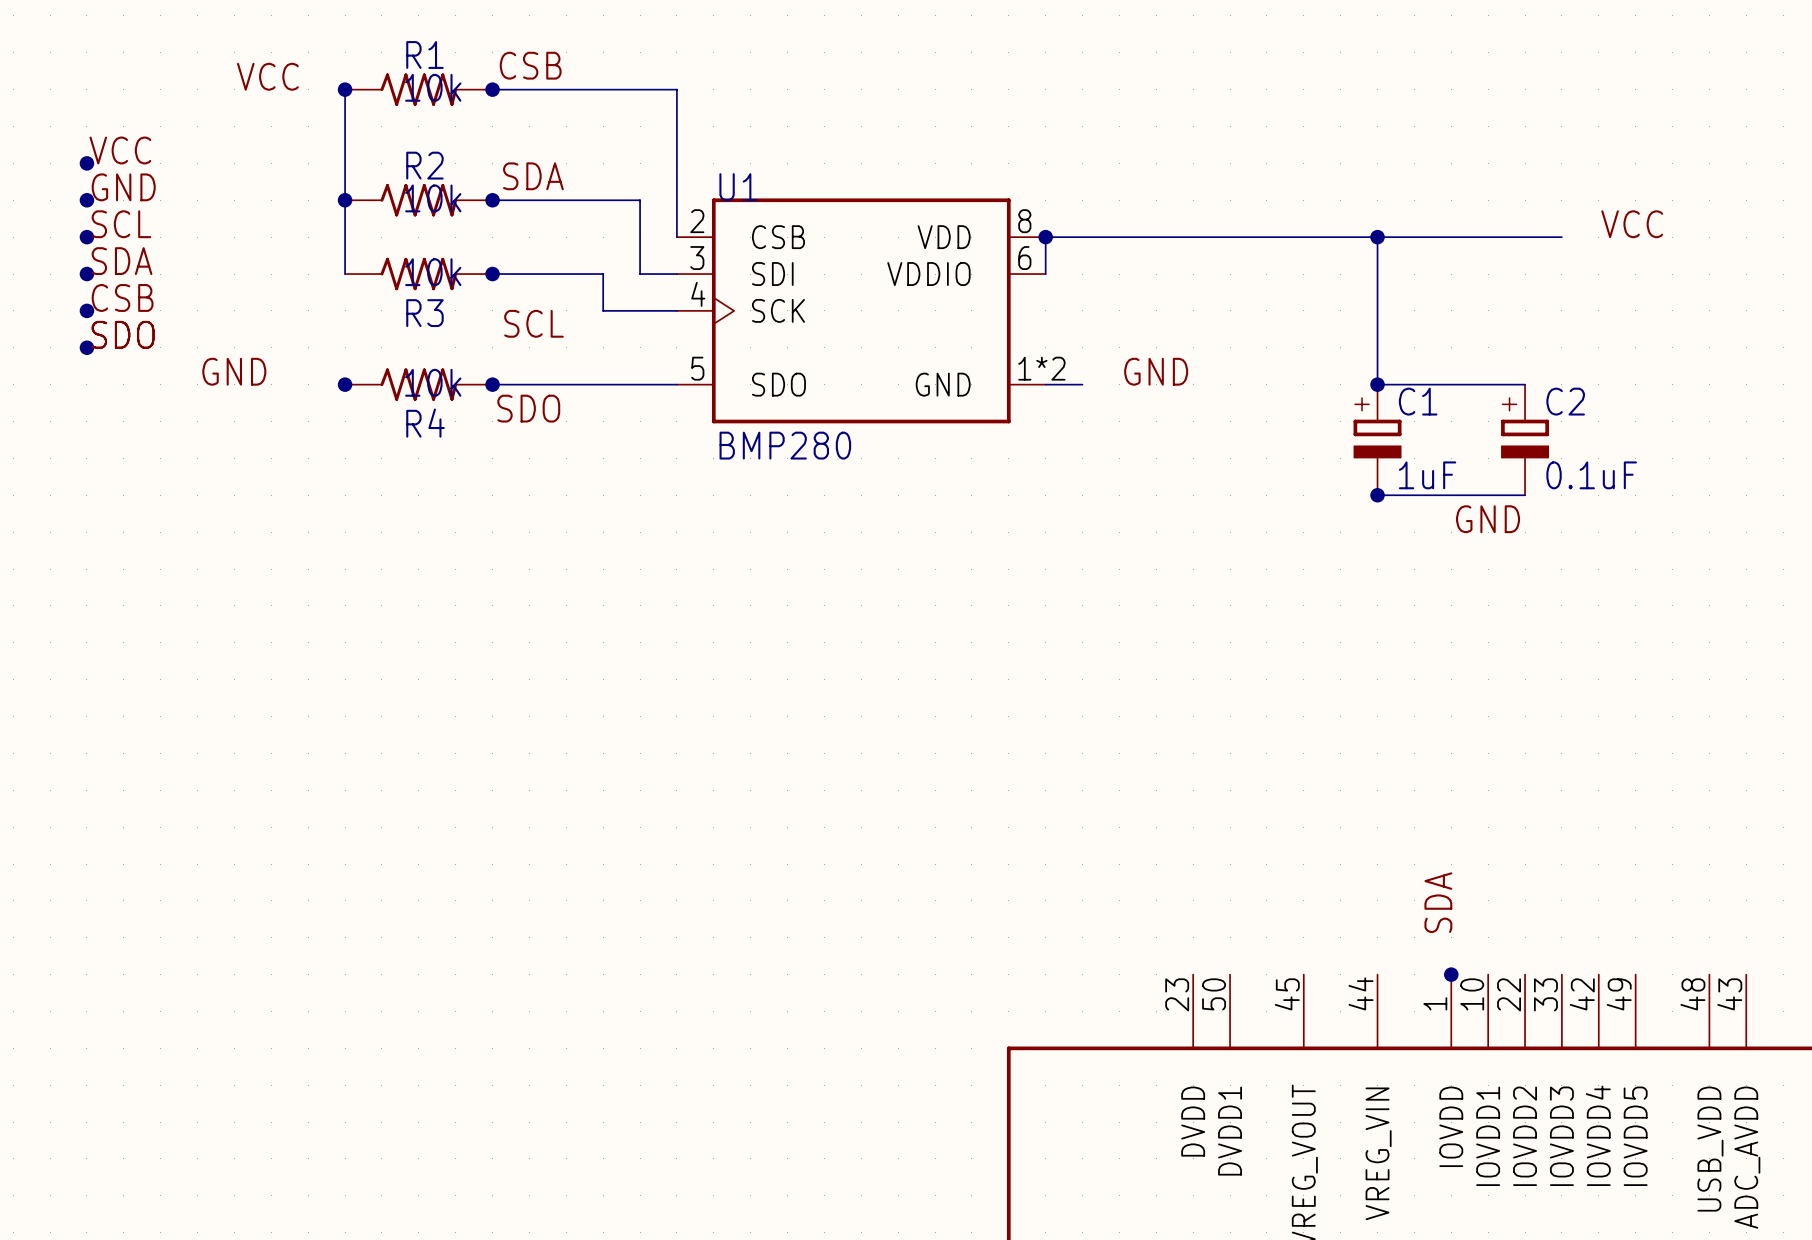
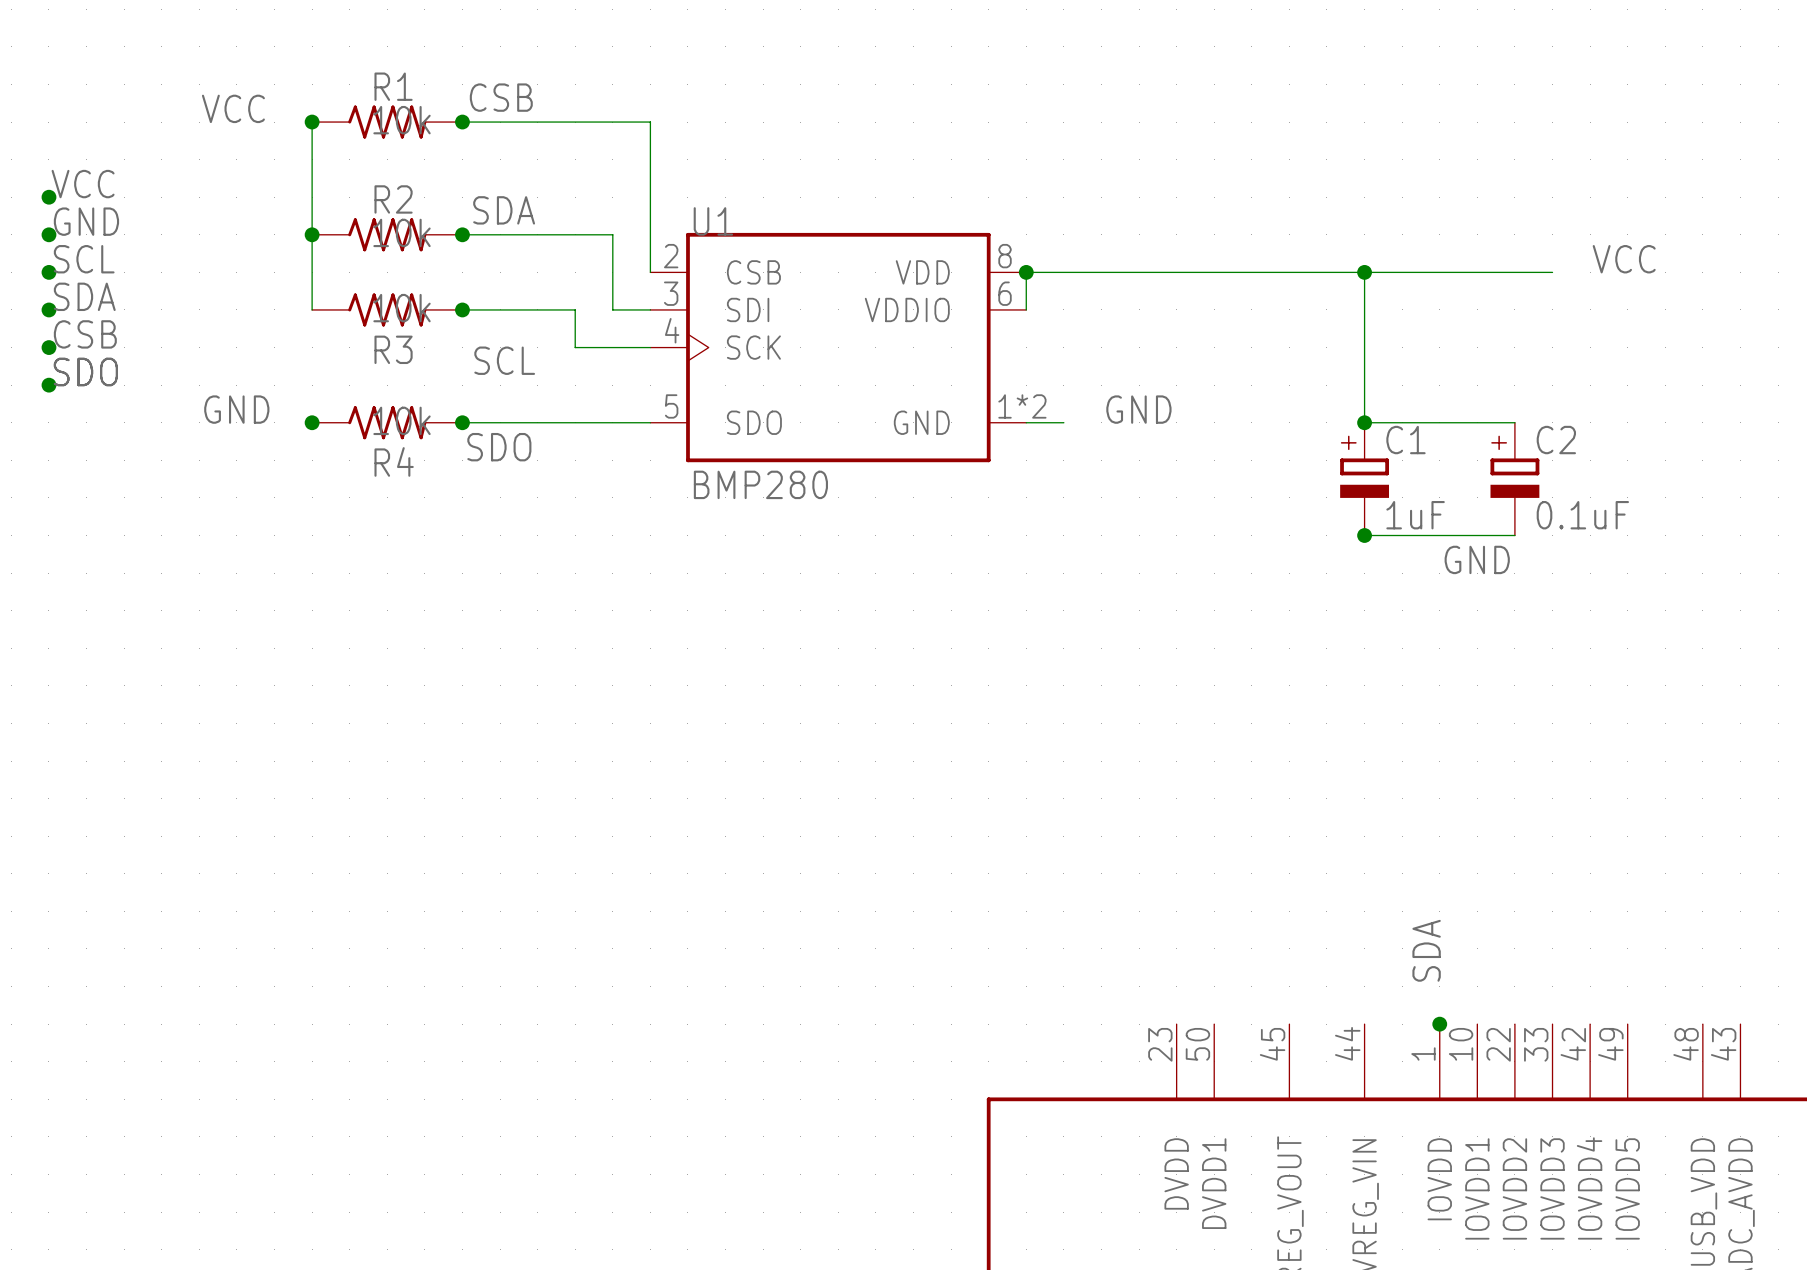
label position: GND (234, 371) -> GND (236, 409)

